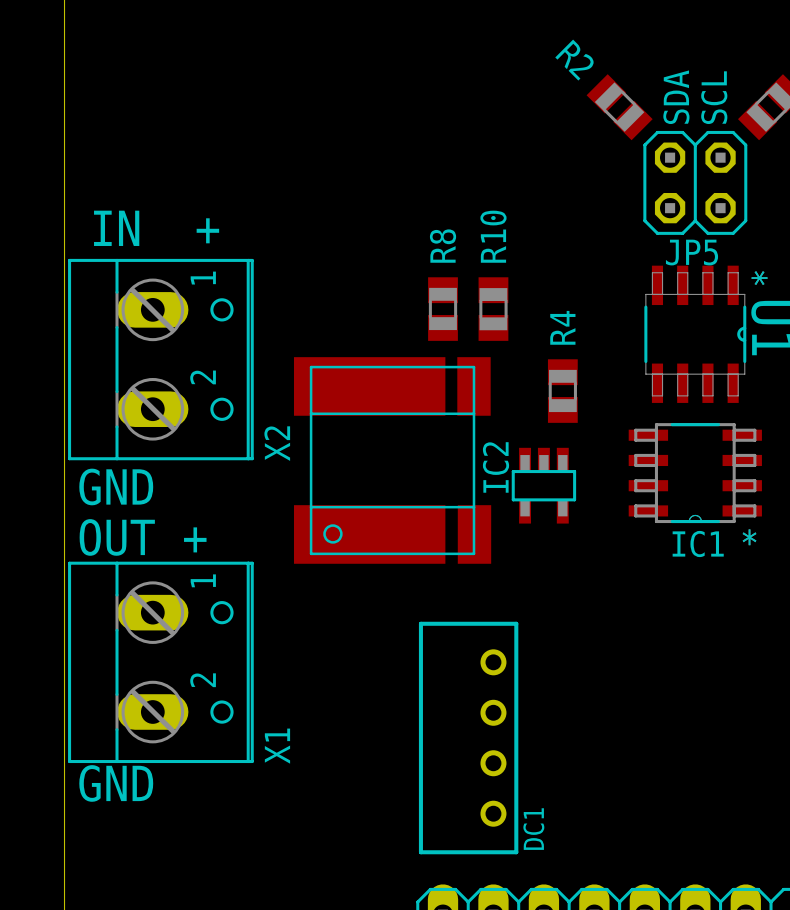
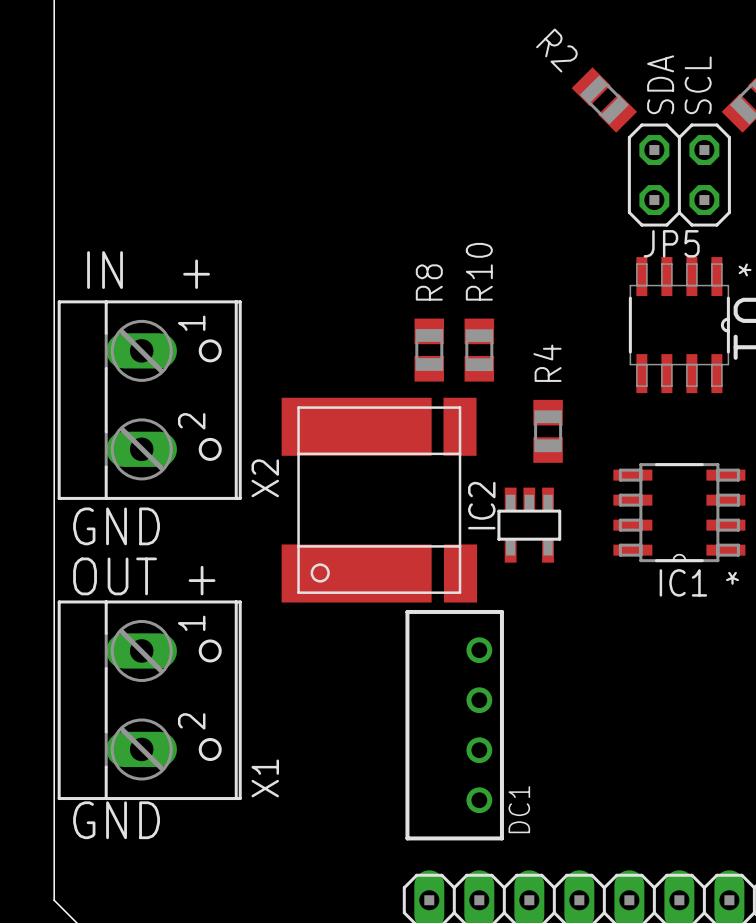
text position: IN + (156, 228) -> IN + (148, 270)
R8 position: (443, 309) -> (429, 350)
R10 position: (493, 309) -> (479, 350)
X2 position: (160, 359) -> (149, 400)
R4 position: (562, 391) -> (548, 431)
part position: (392, 460) -> (379, 500)
IC1 position: (695, 473) -> (679, 512)
IC2 position: (543, 485) -> (529, 525)
text: GND (116, 486) -> none
text: OUT + (143, 537) -> GND (116, 526)
text: none -> OUT + (144, 576)
X1 position: (160, 662) -> (149, 700)
text position: GND (116, 783) -> GND (116, 820)

